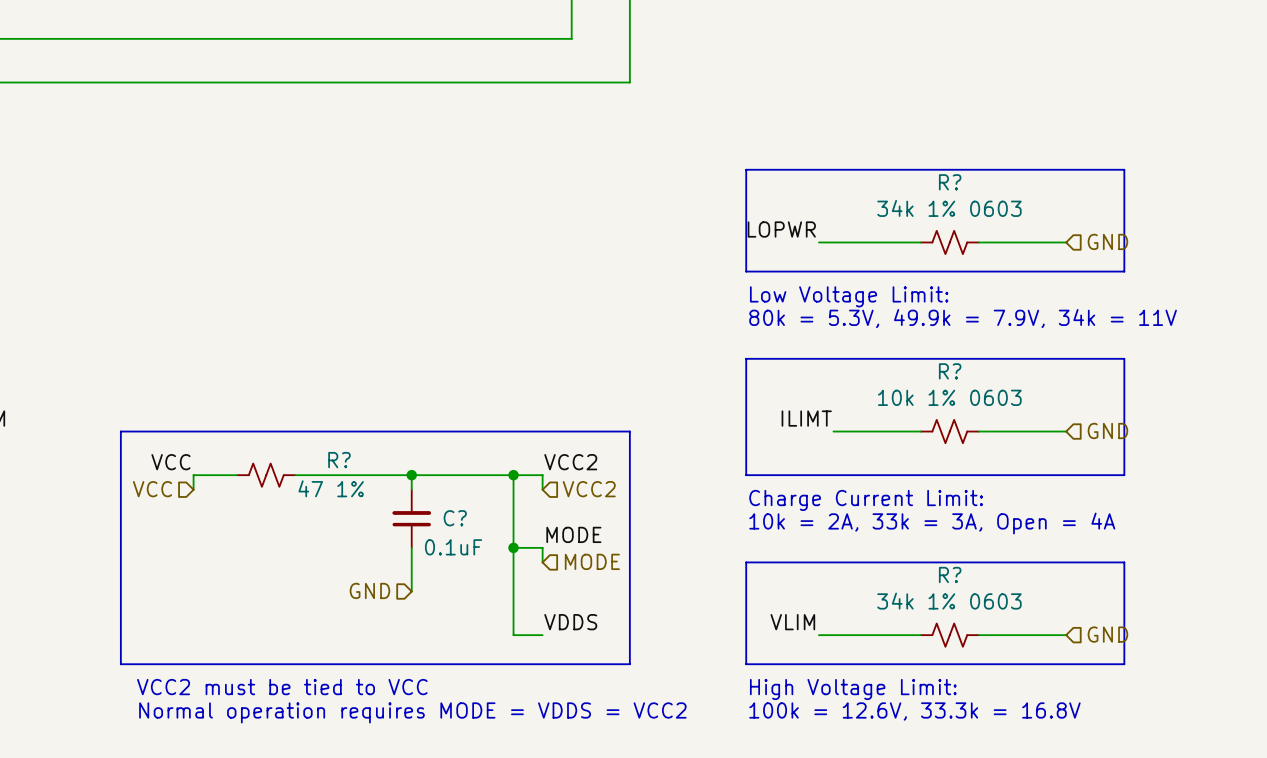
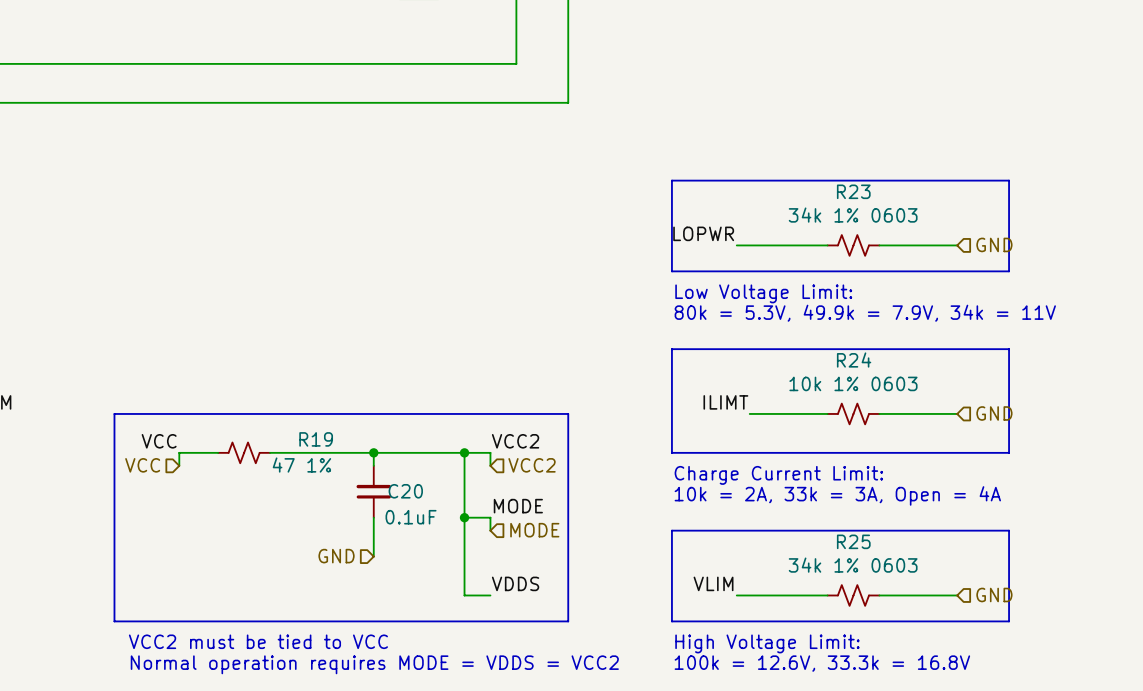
R? name: R? (950, 182) -> R23 (853, 191)
R? name: R? (950, 371) -> R24 (854, 360)
R? name: R? (339, 460) -> R19 (316, 439)
C? name: C? (455, 518) -> C20 (405, 491)
R? name: R? (950, 574) -> R25 (853, 541)

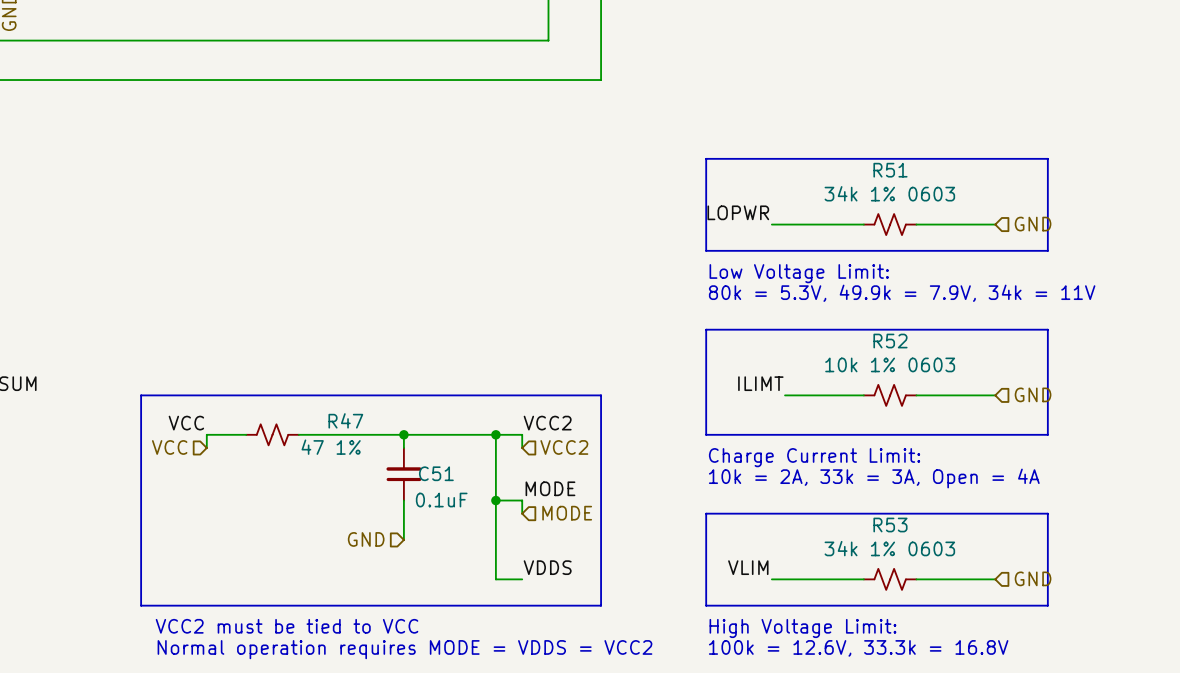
R23 name: R23 (853, 191) -> R51 (890, 170)
R24 name: R24 (854, 360) -> R52 (890, 341)
R19 name: R19 (316, 439) -> R47 (345, 420)
C20 name: C20 (405, 491) -> C51 (436, 473)
R25 name: R25 (853, 541) -> R53 (890, 525)

